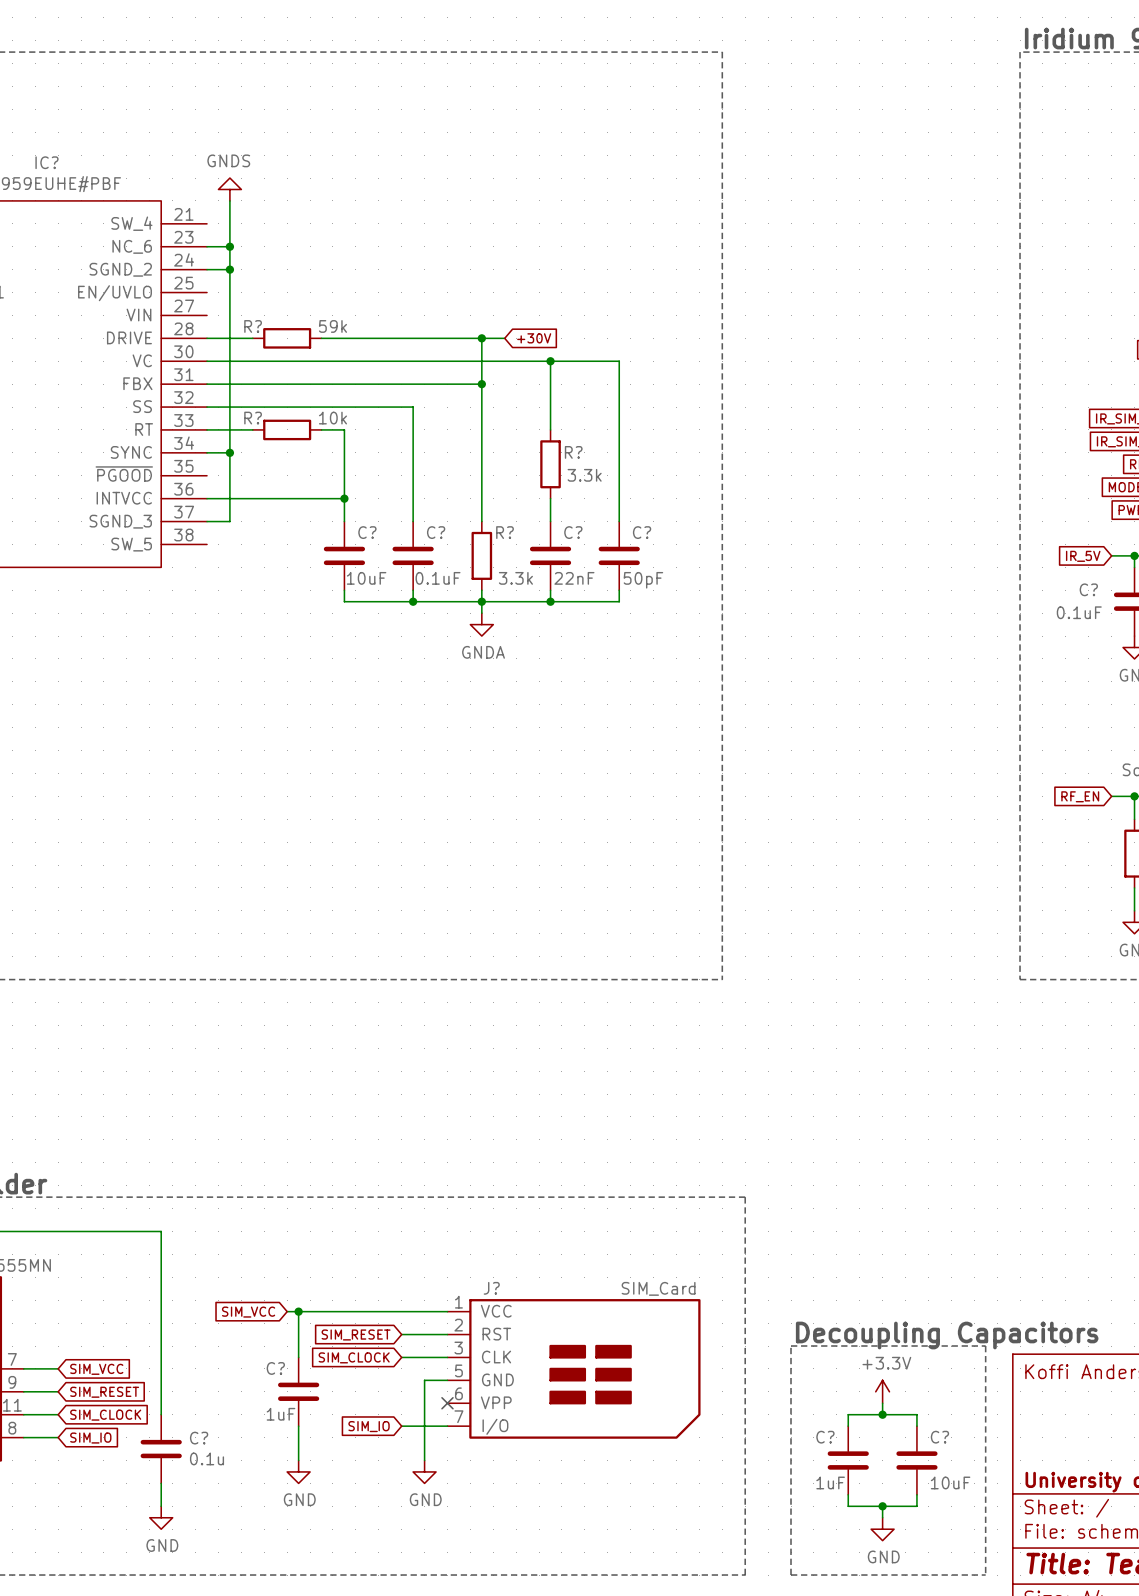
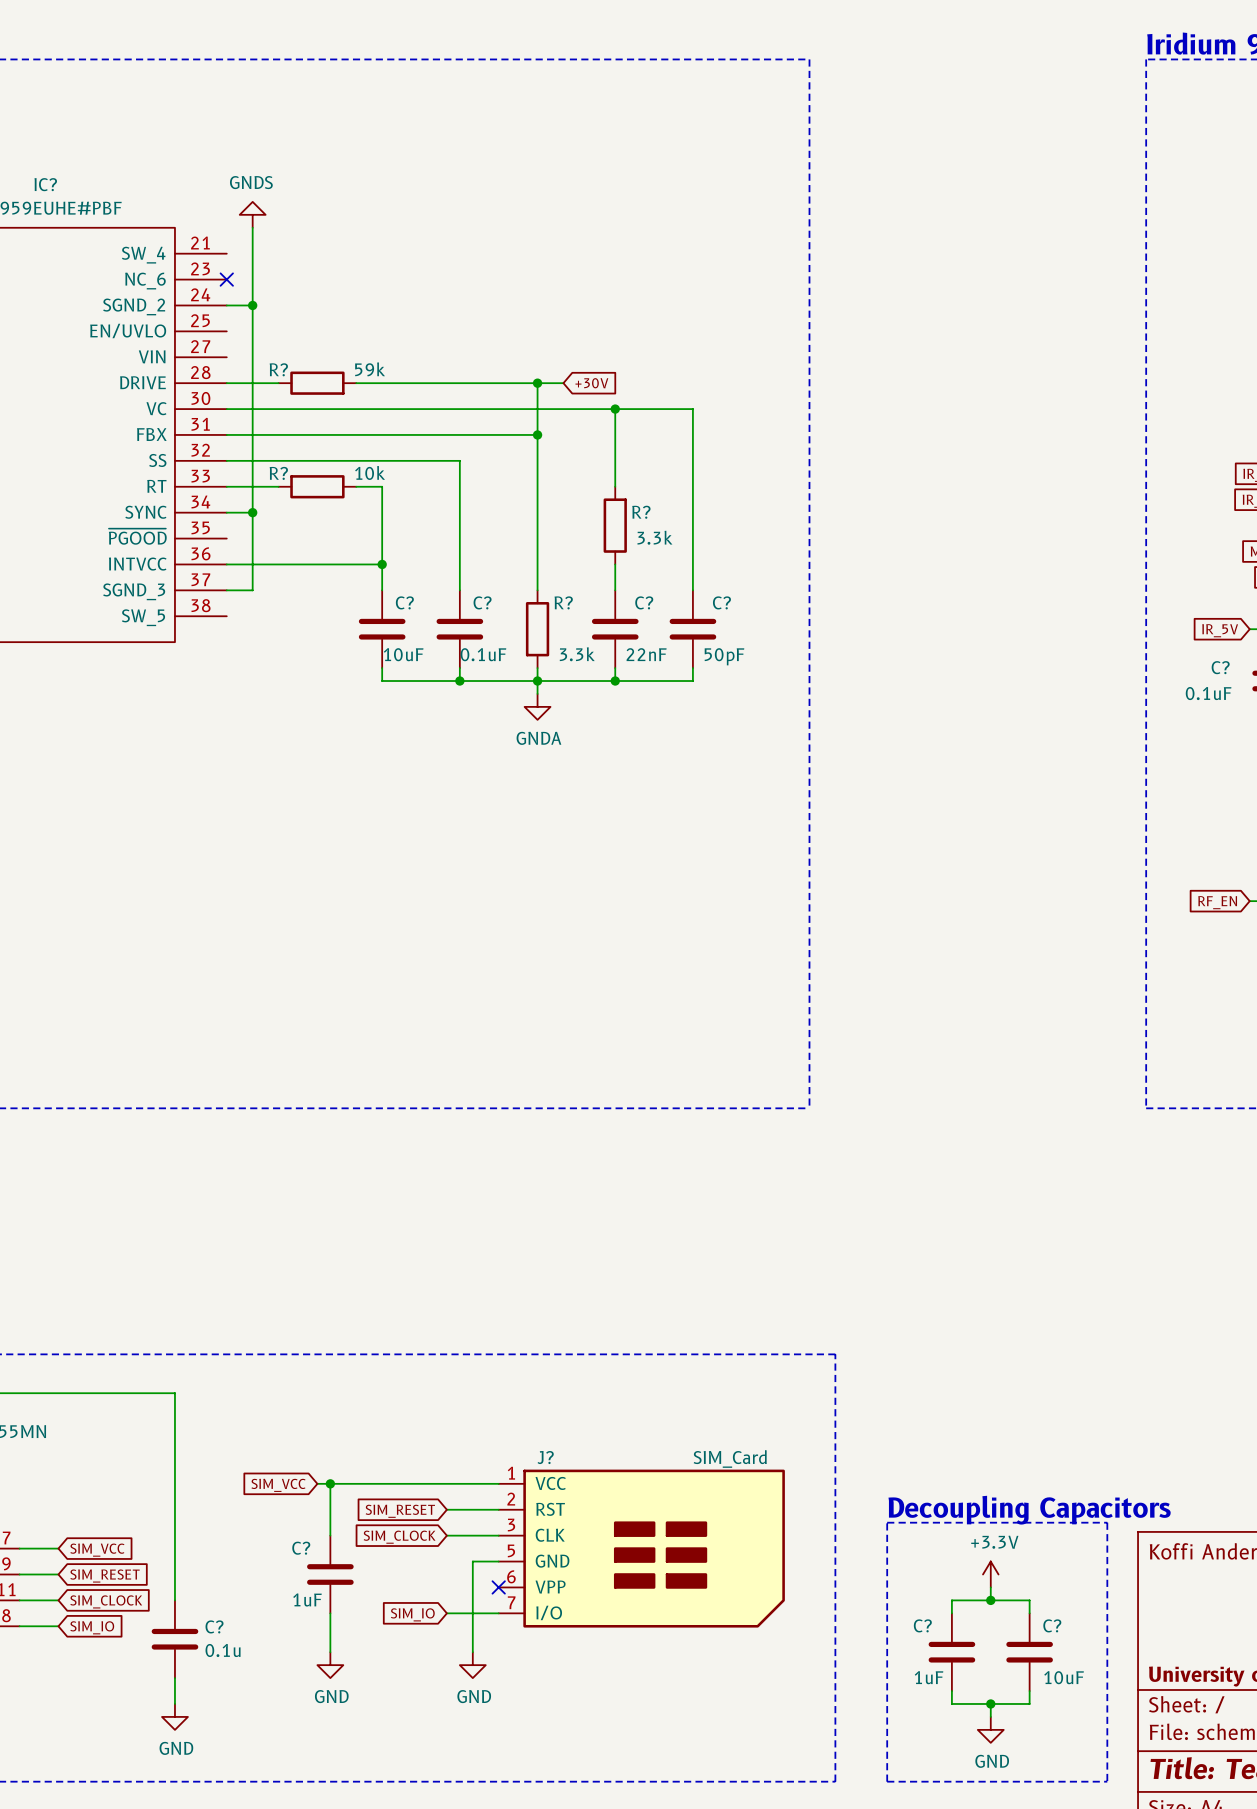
wire: (207, 246) (229, 246) -> none
no-connect mark: none -> (226, 279)
junction: (229, 246) -> none

